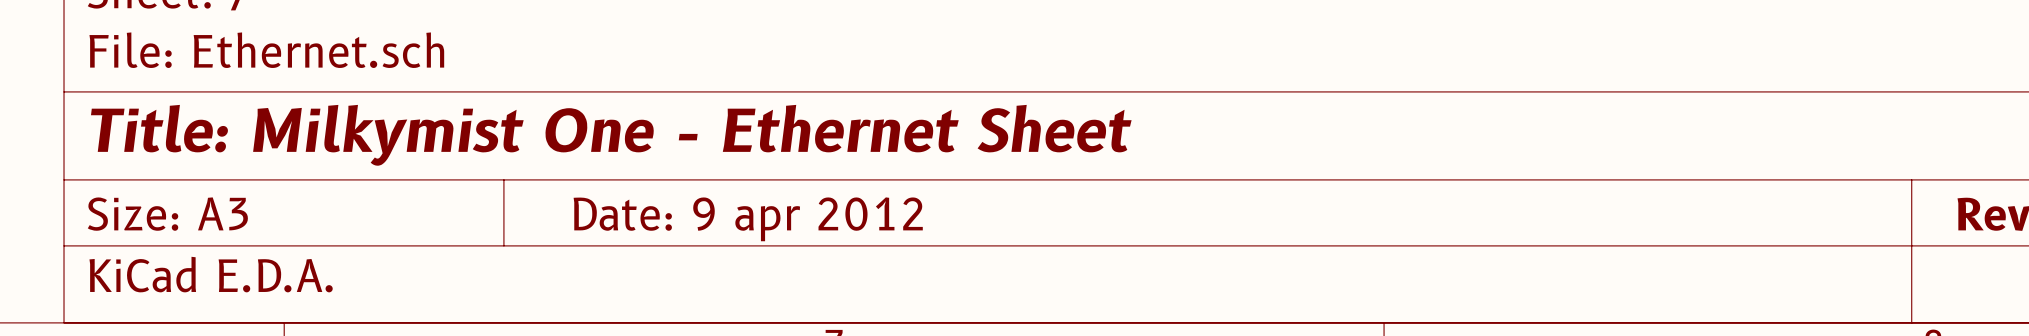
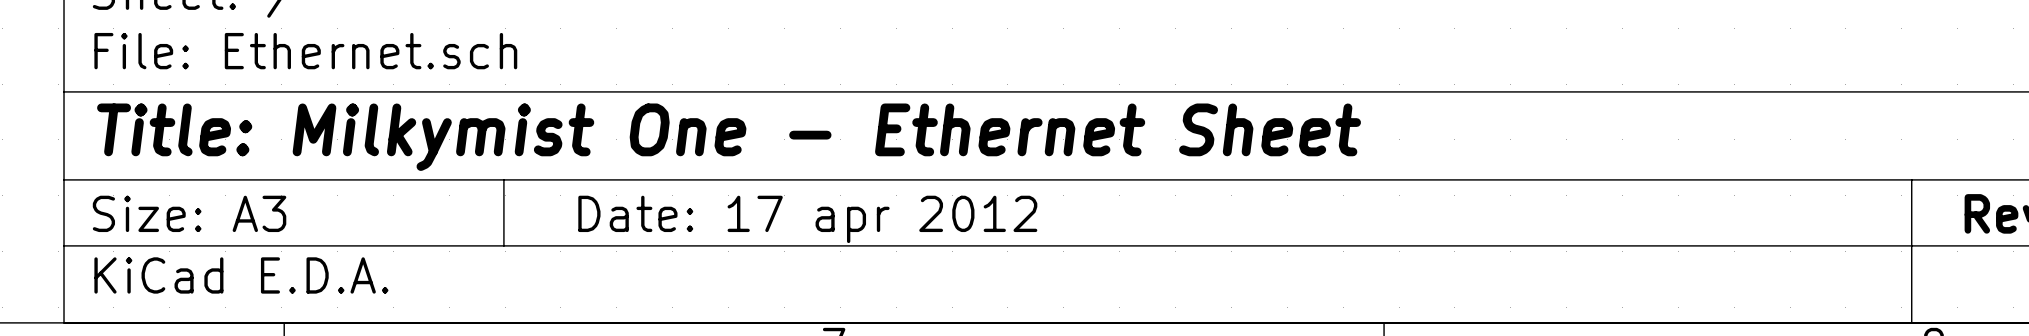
title block: Date: 9 apr 2012 (748, 219) -> Date: 17 apr 2012 (807, 219)

